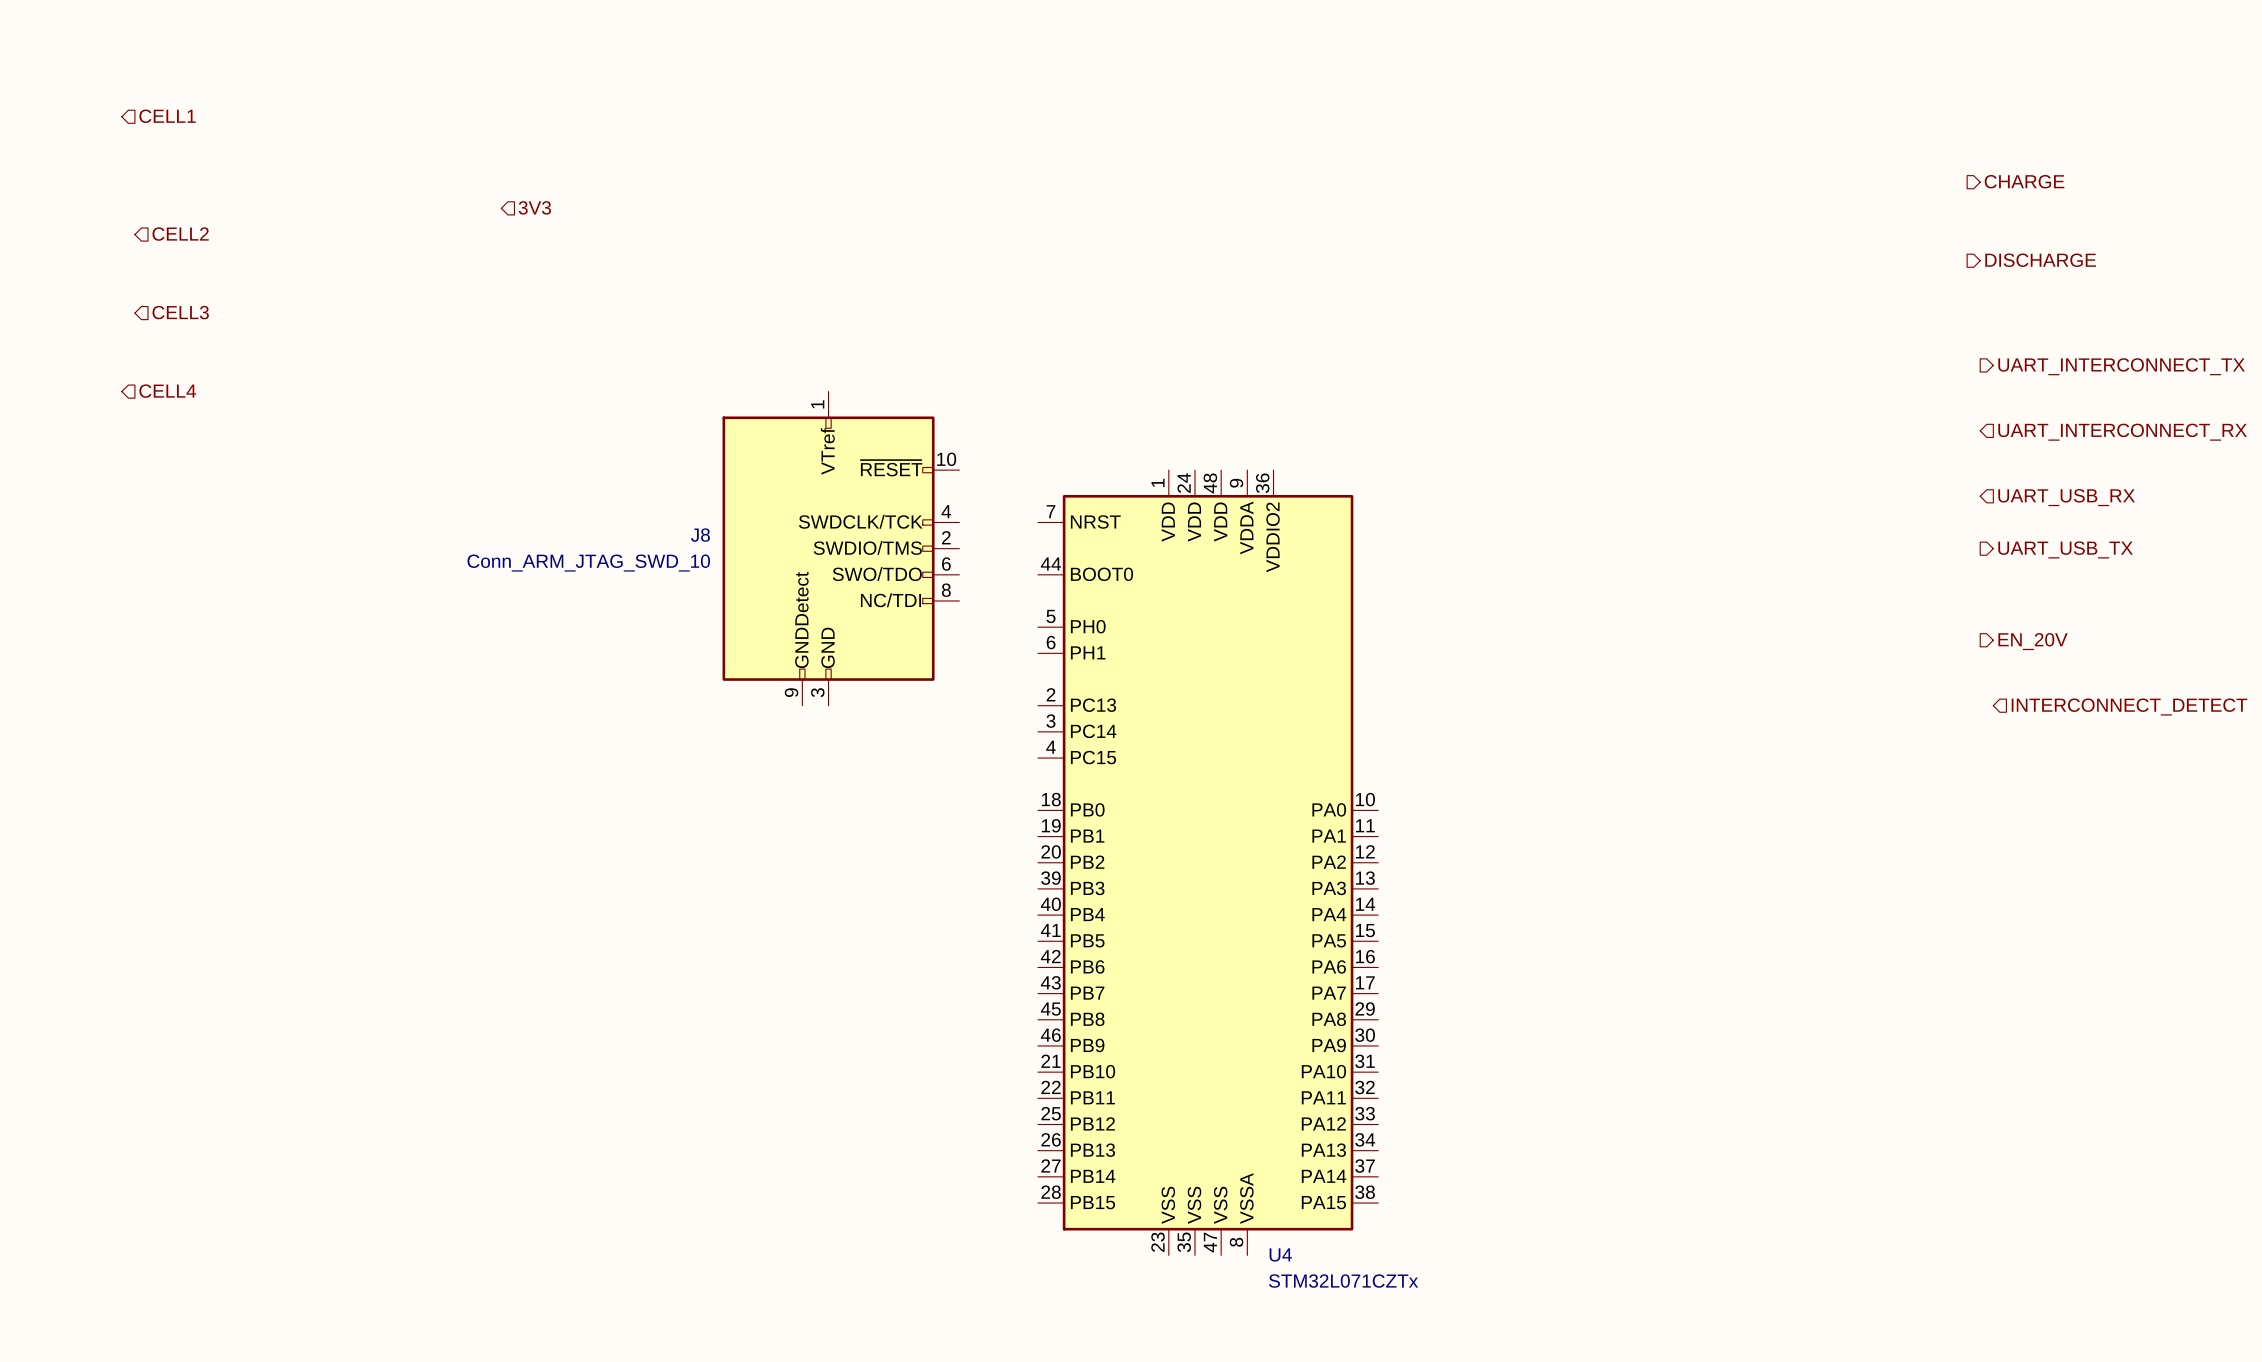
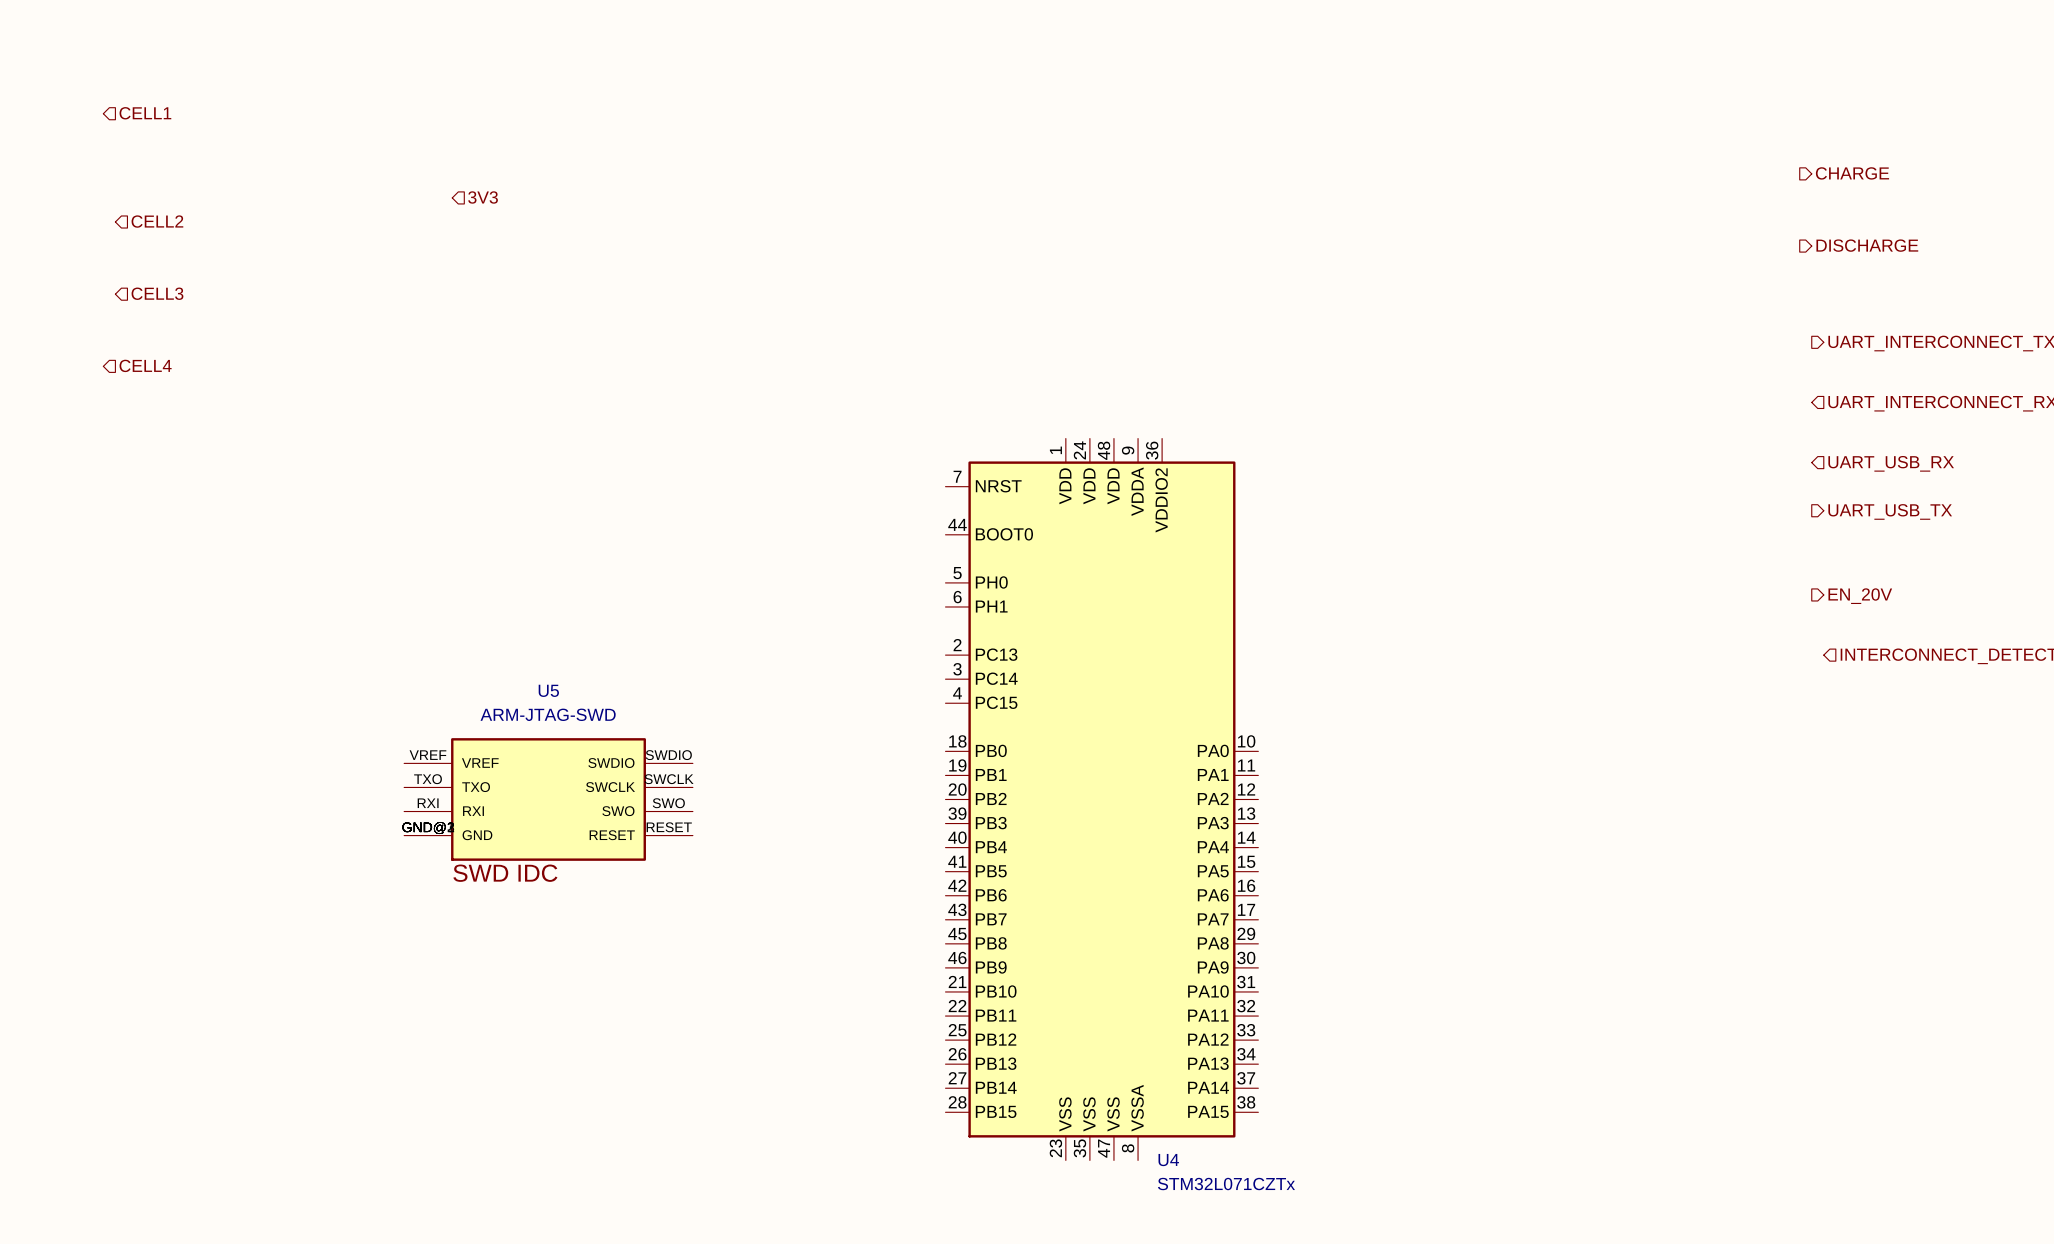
J8: Conn_ARM_JTAG_SWD_10 (840, 548) -> none
U5: none -> ARM-JTAG-SWD (548, 799)

